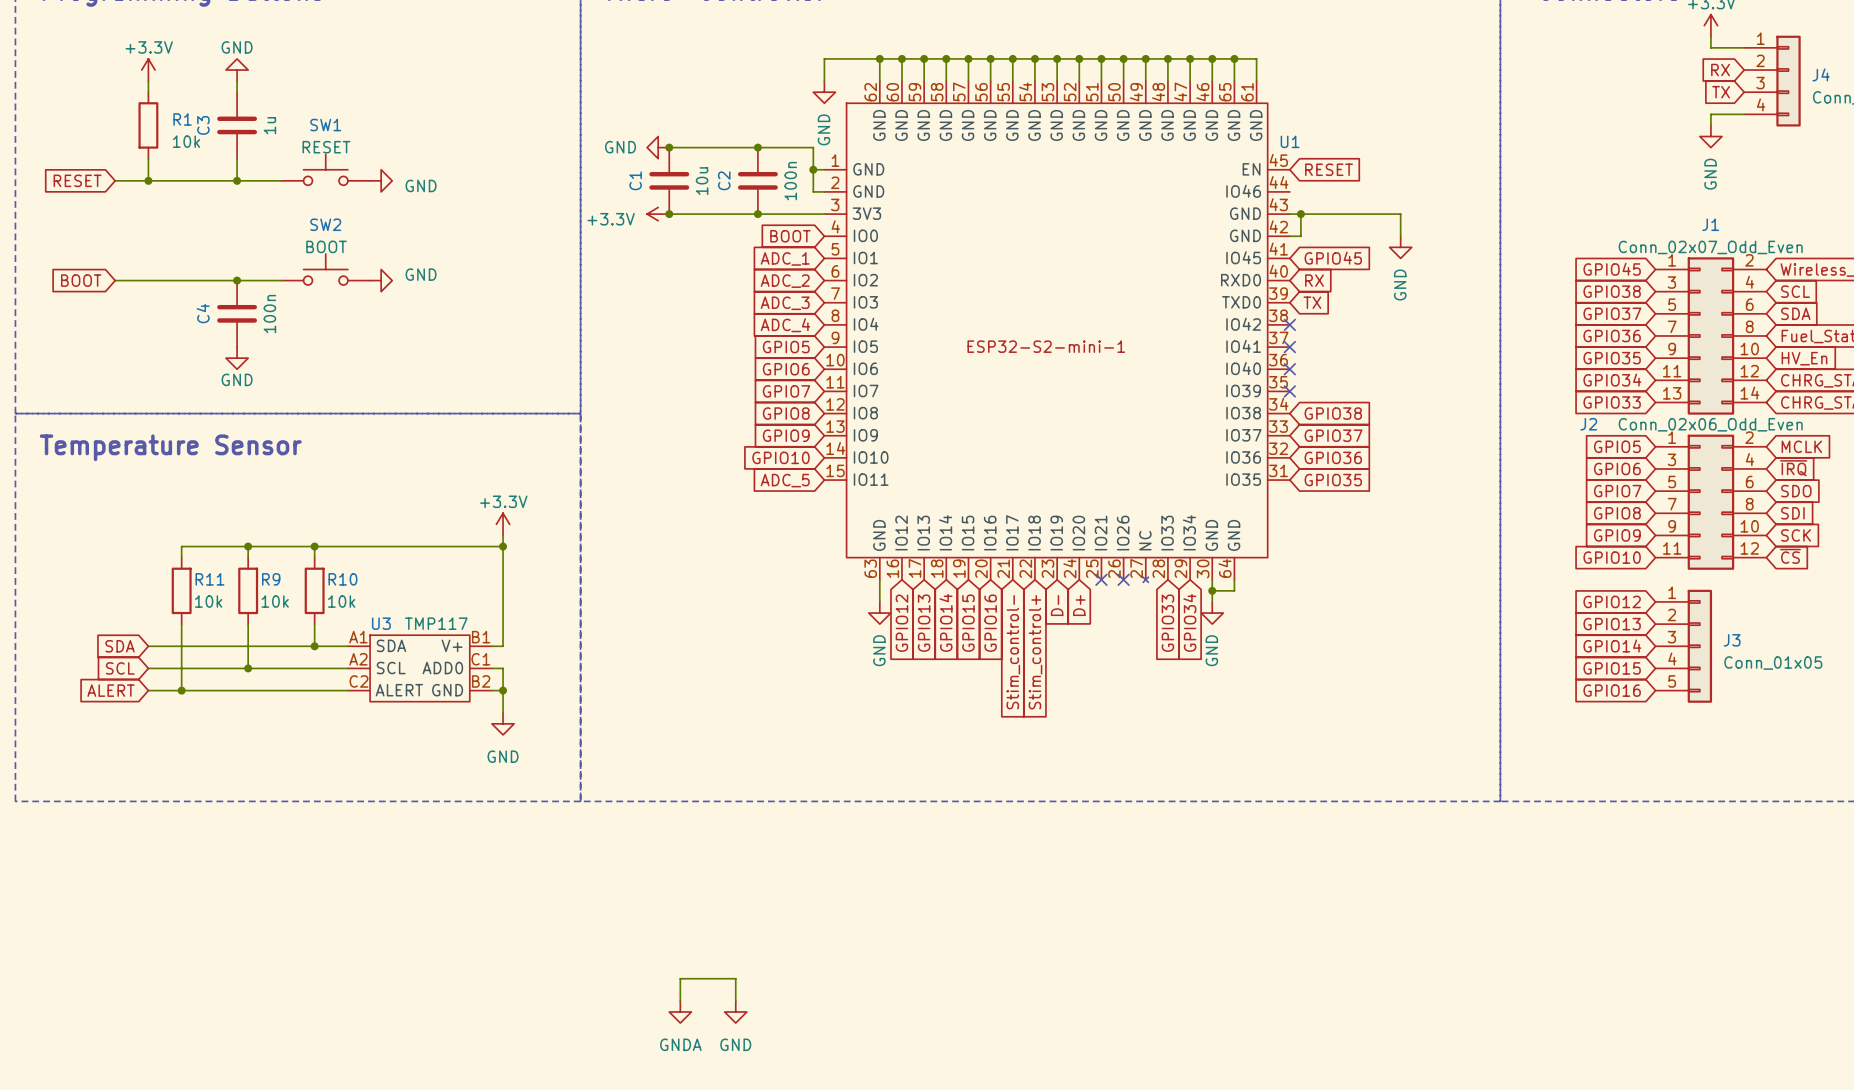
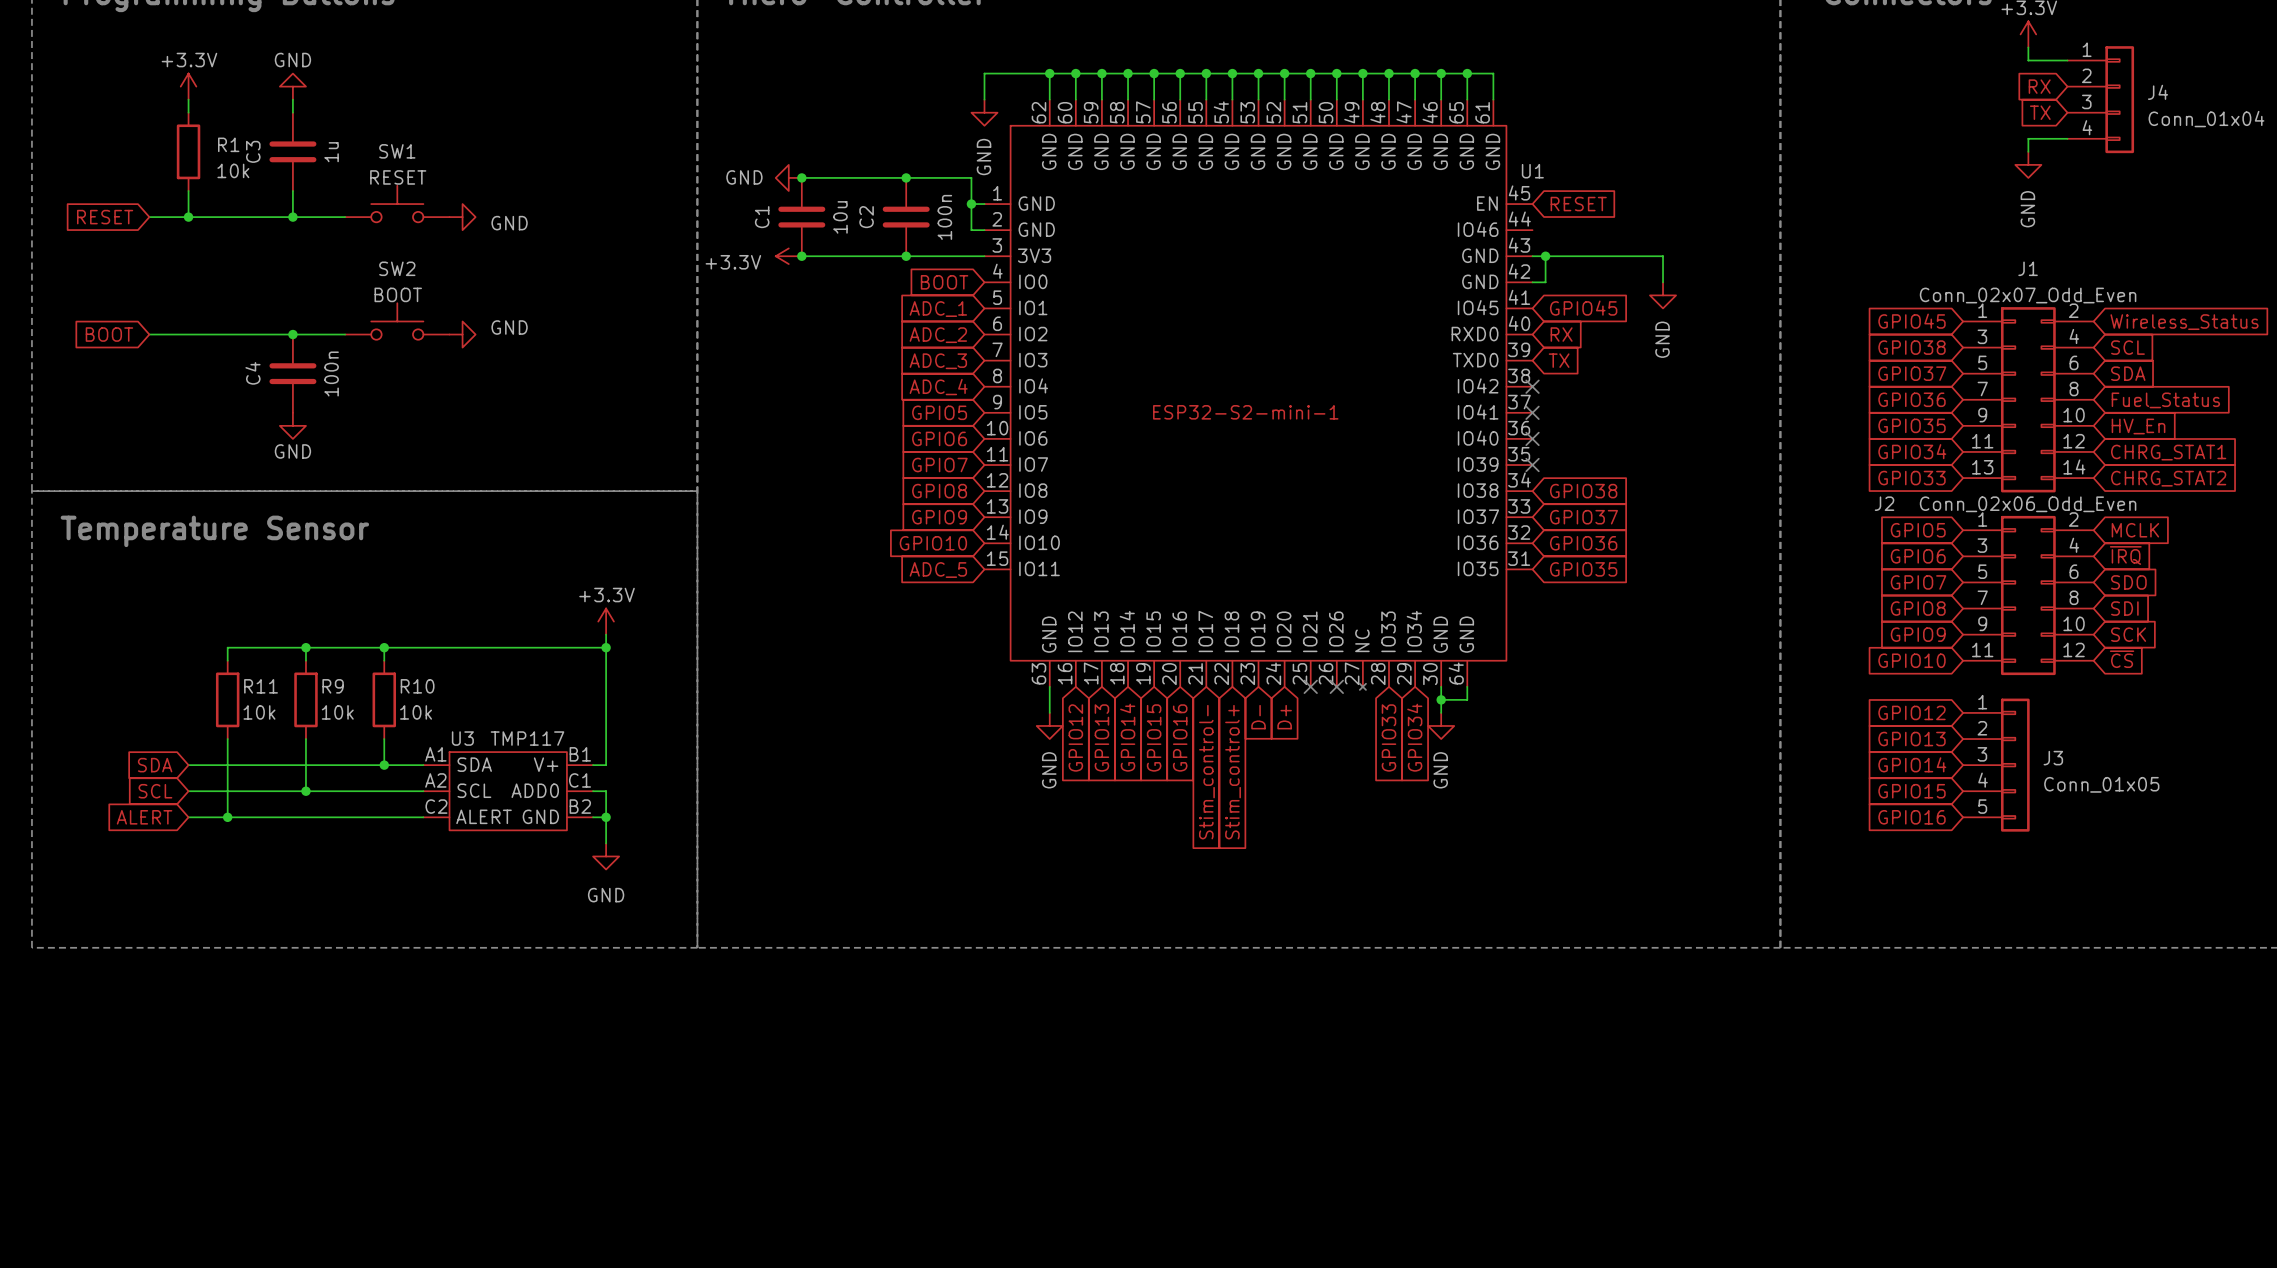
wire: (680, 1000) (680, 978) (735, 978) (735, 1000) -> none
power symbol: GNDA (680, 1011) -> none
power symbol: GND (735, 1011) -> none

